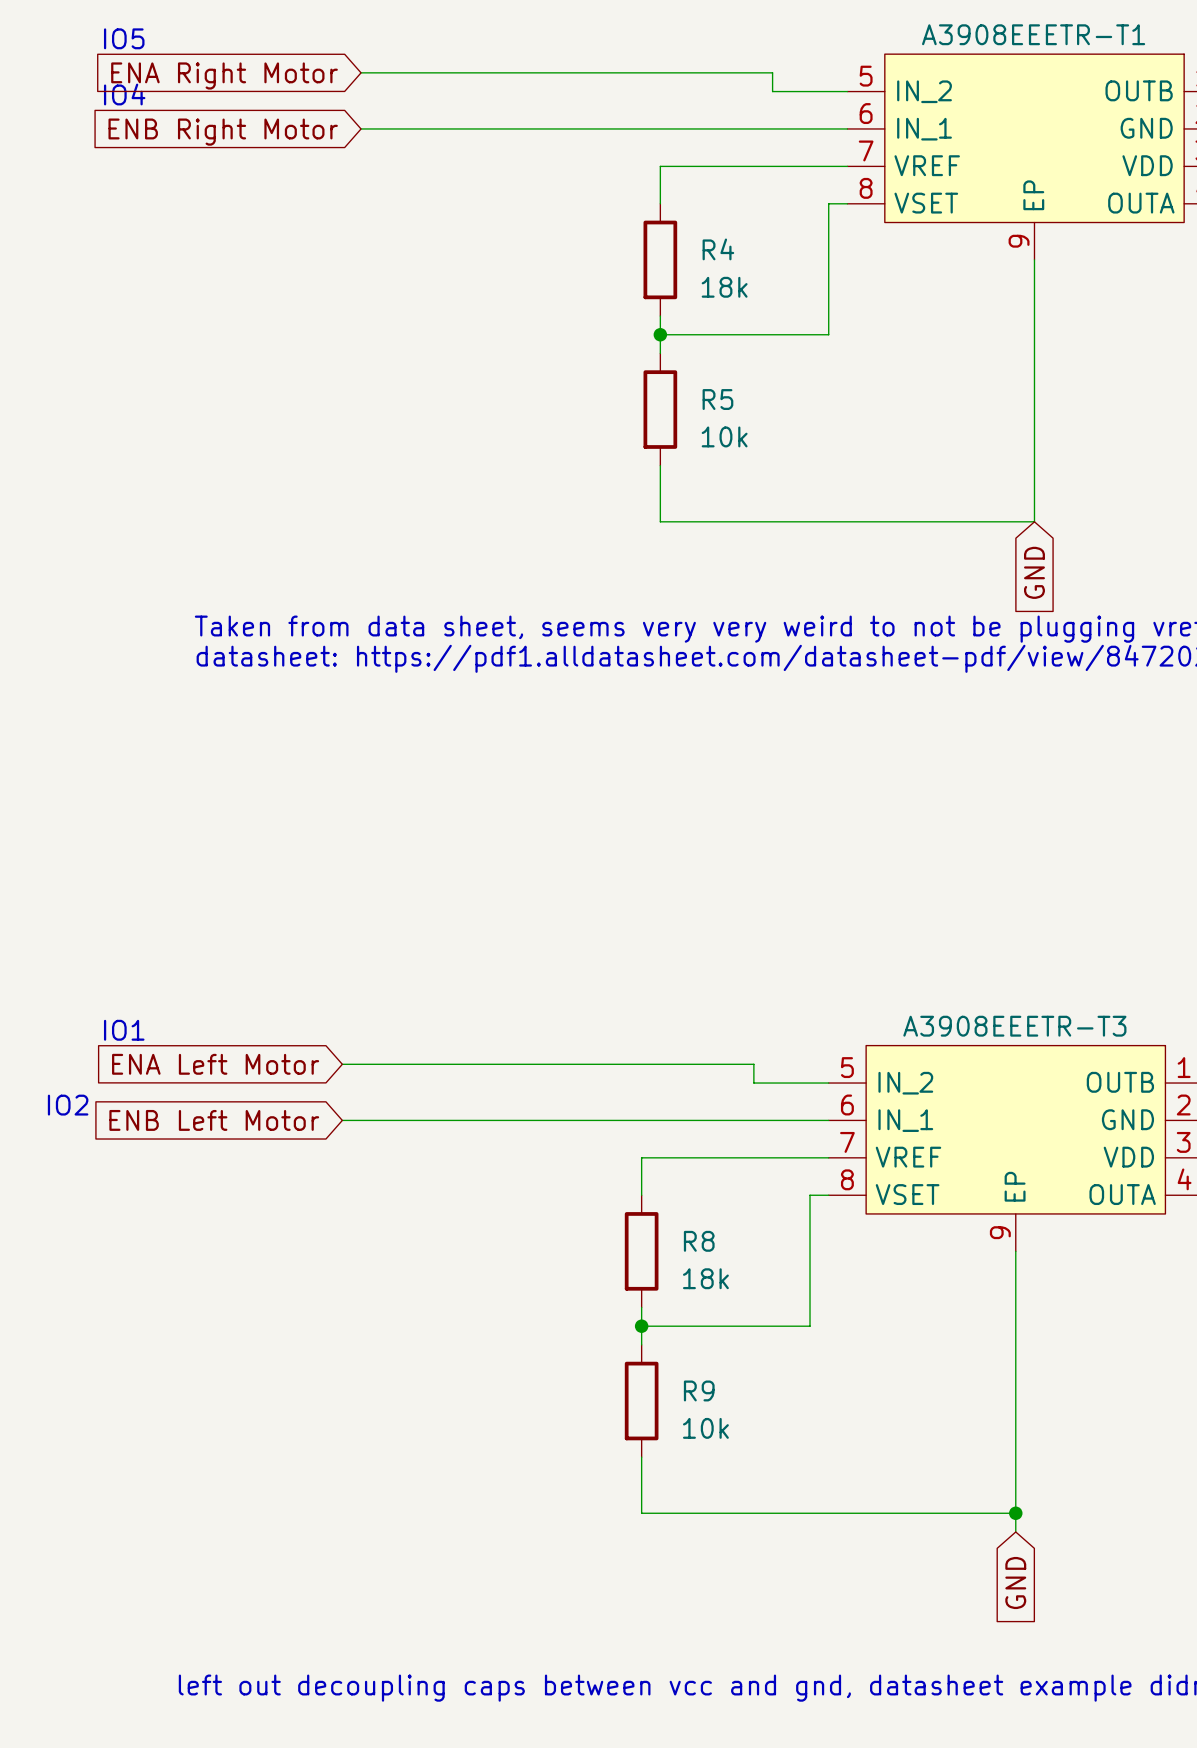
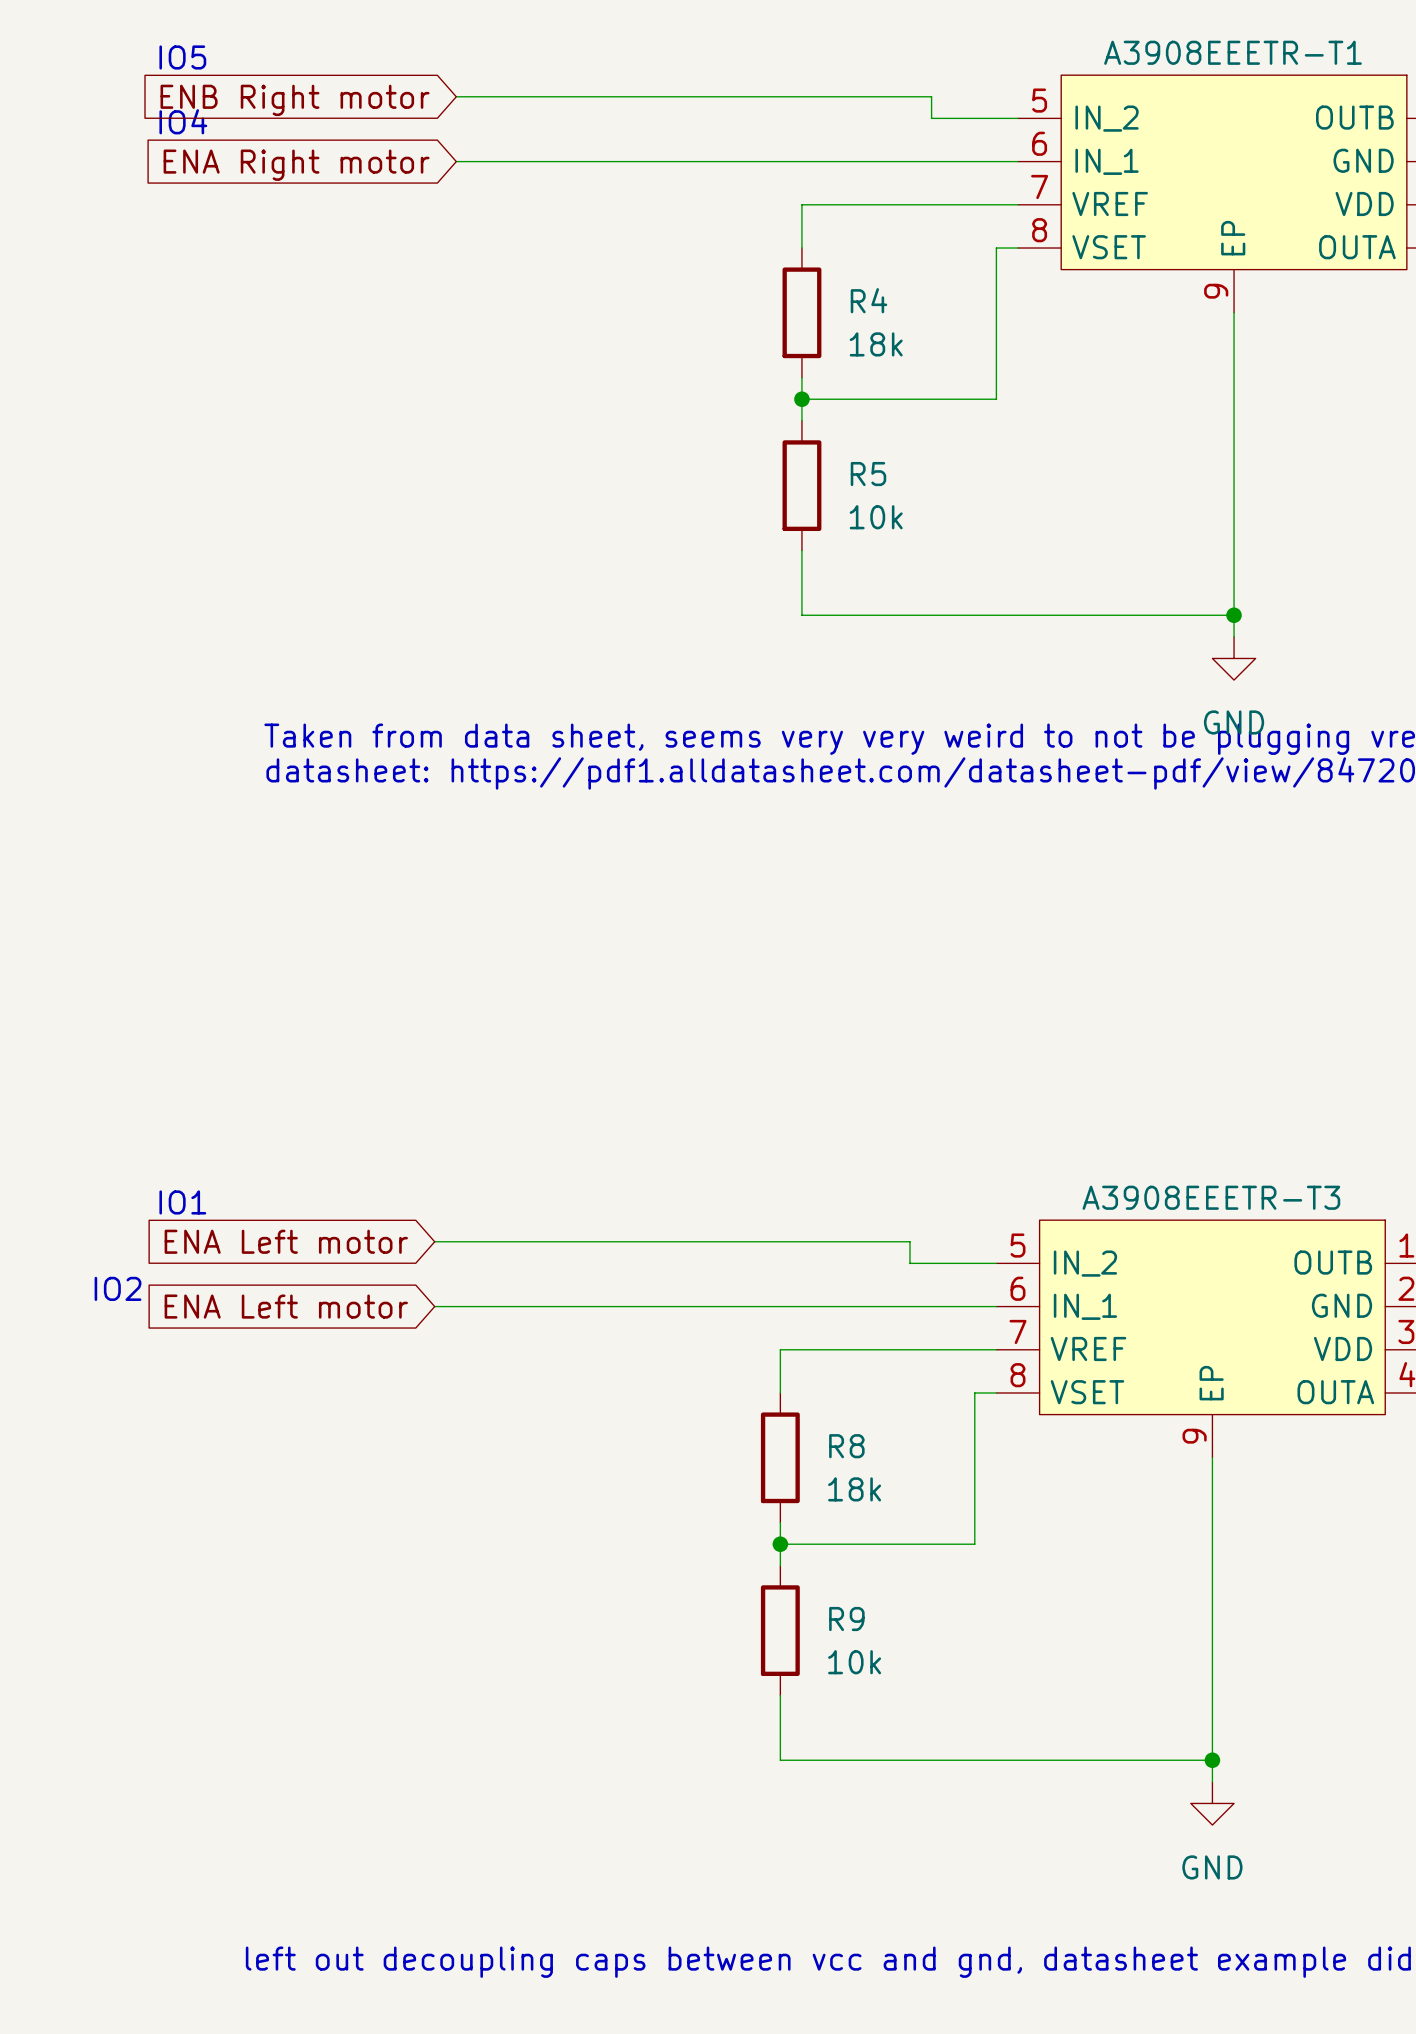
global label: ENA Right Motor (224, 75) -> ENB Right motor (295, 100)
global label: ENB Right Motor (223, 132) -> ENA Right motor (296, 165)
wire: none -> (1234, 615) (1234, 636)
junction: none -> (1234, 615)
power symbol: none -> GND (1234, 658)
global label: GND (1034, 572) -> none
global label: ENA Left Motor (215, 1064) -> ENA Left motor (286, 1241)
global label: ENB Left Motor (214, 1120) -> ENA Left motor (286, 1306)
power symbol: none -> GND (1212, 1803)
global label: GND (1015, 1583) -> none

